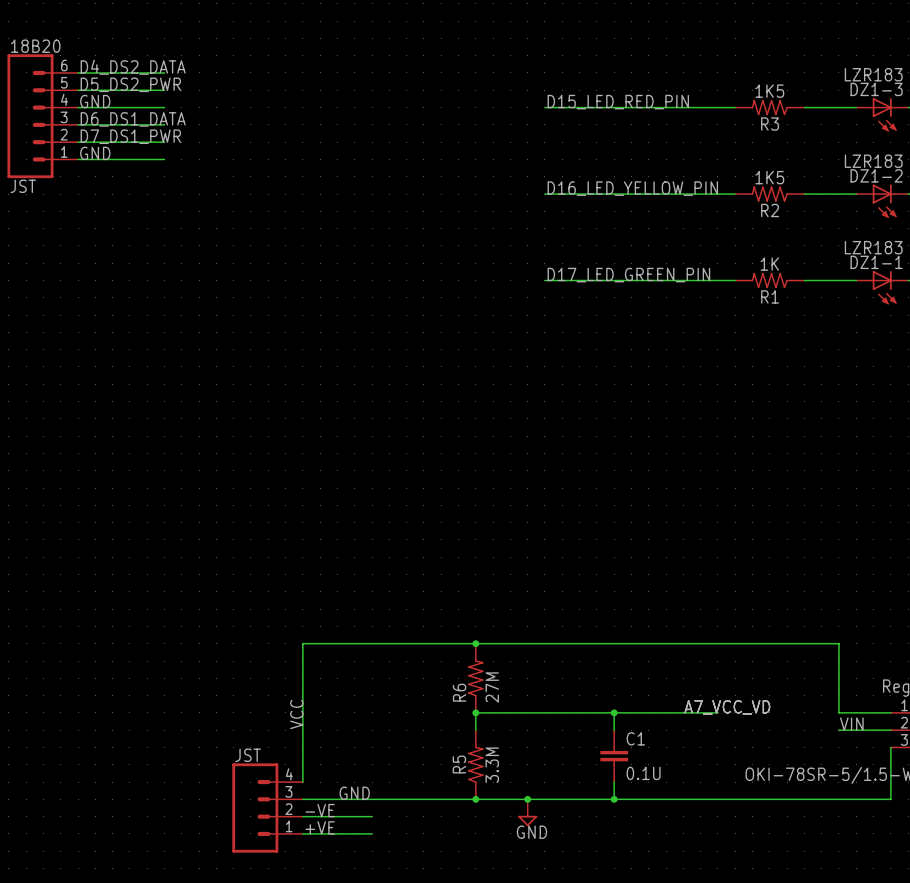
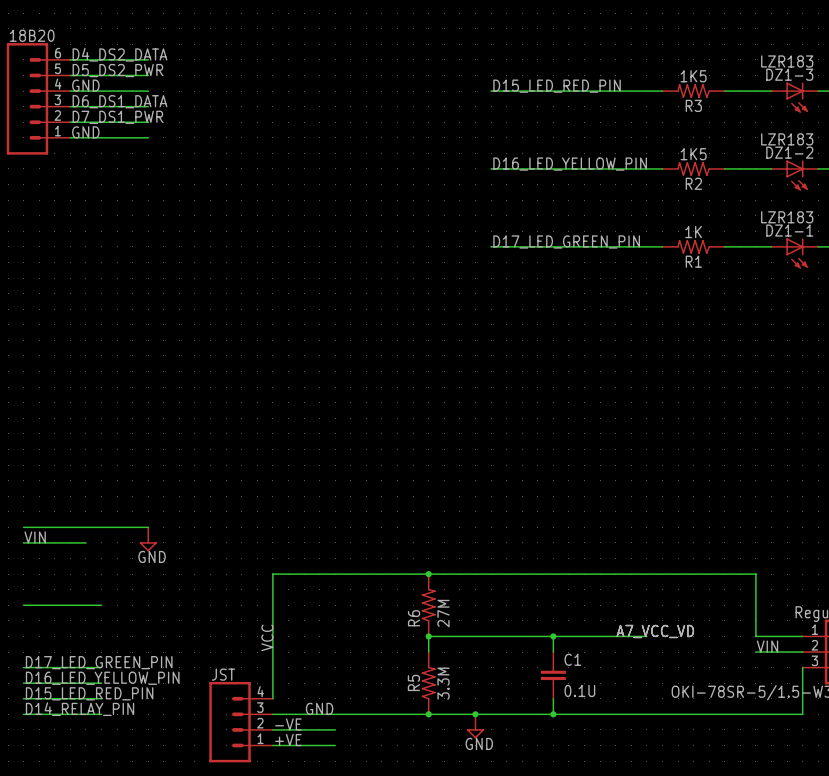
18B20 value: JST (23, 186) -> none
wire: none -> (23, 527) (148, 527)
label: none -> VIN (35, 537)
power symbol: none -> GND (148, 539)
wire: none -> (23, 542) (85, 542)
wire: none -> (23, 605) (101, 605)
label: none -> D17_LED_GREEN_PIN (99, 662)
wire: none -> (23, 667) (101, 667)
label: none -> D16_LED_YELLOW_PIN (102, 678)
wire: none -> (23, 683) (101, 683)
label: none -> D15_LED_RED_PIN (89, 693)
wire: none -> (23, 698) (101, 698)
label: none -> D14_RELAY_PIN (80, 709)
wire: none -> (23, 714) (101, 714)

